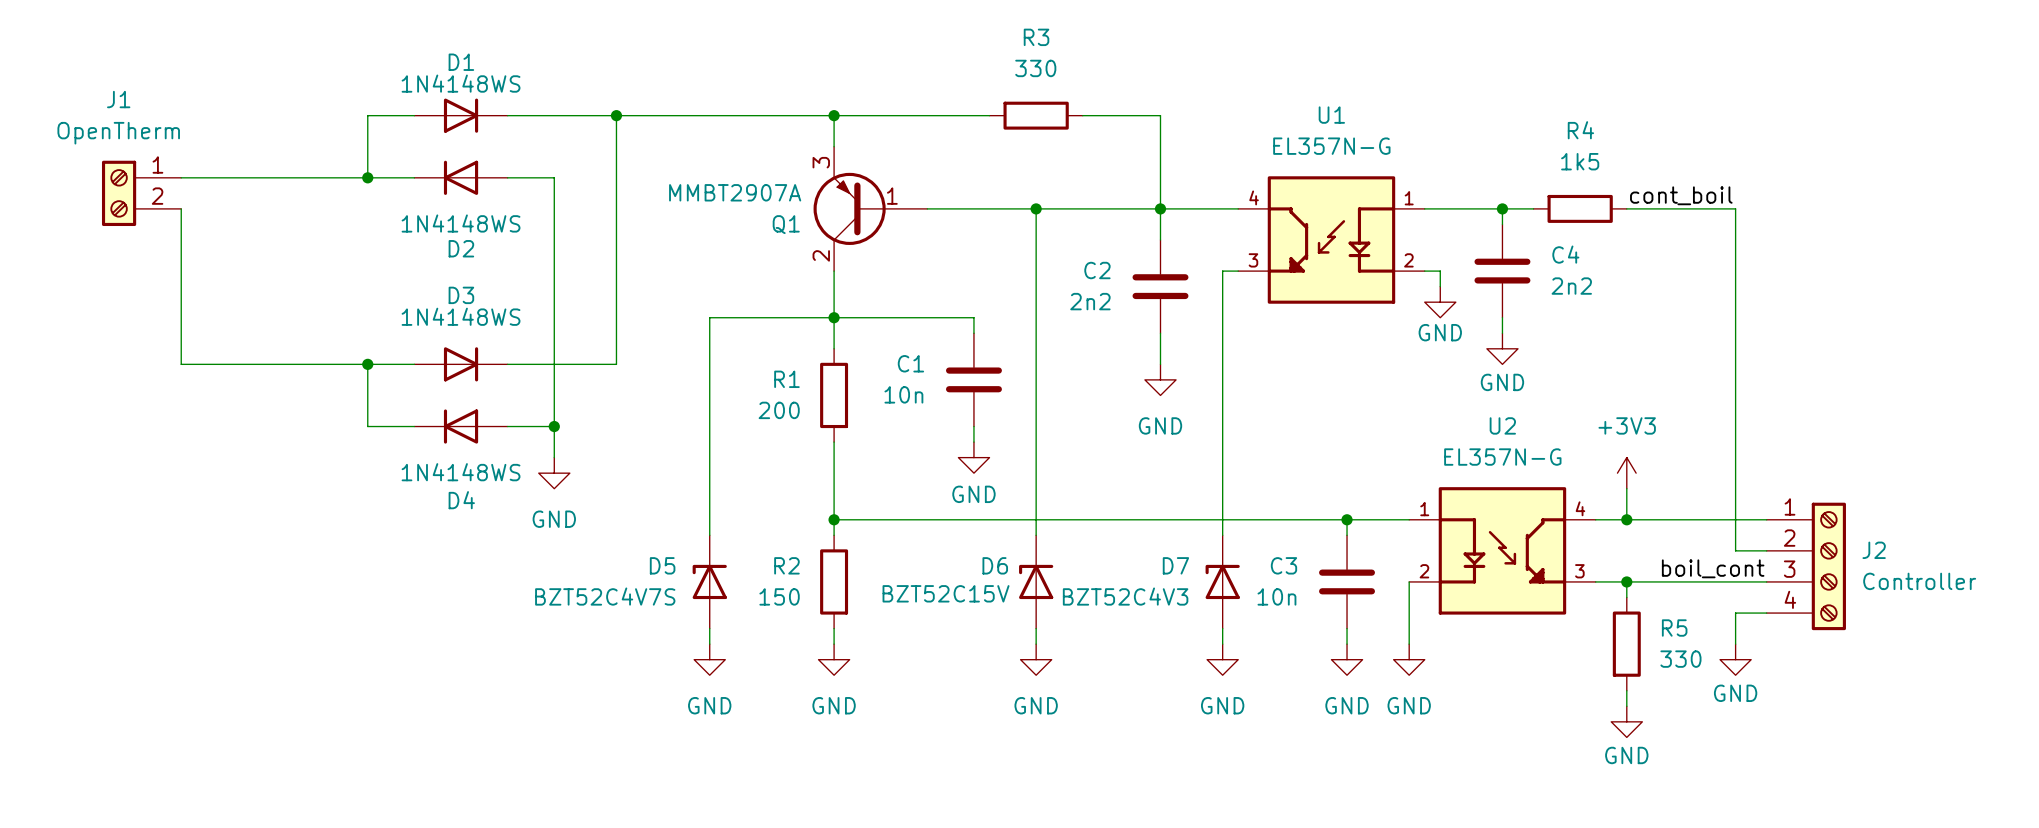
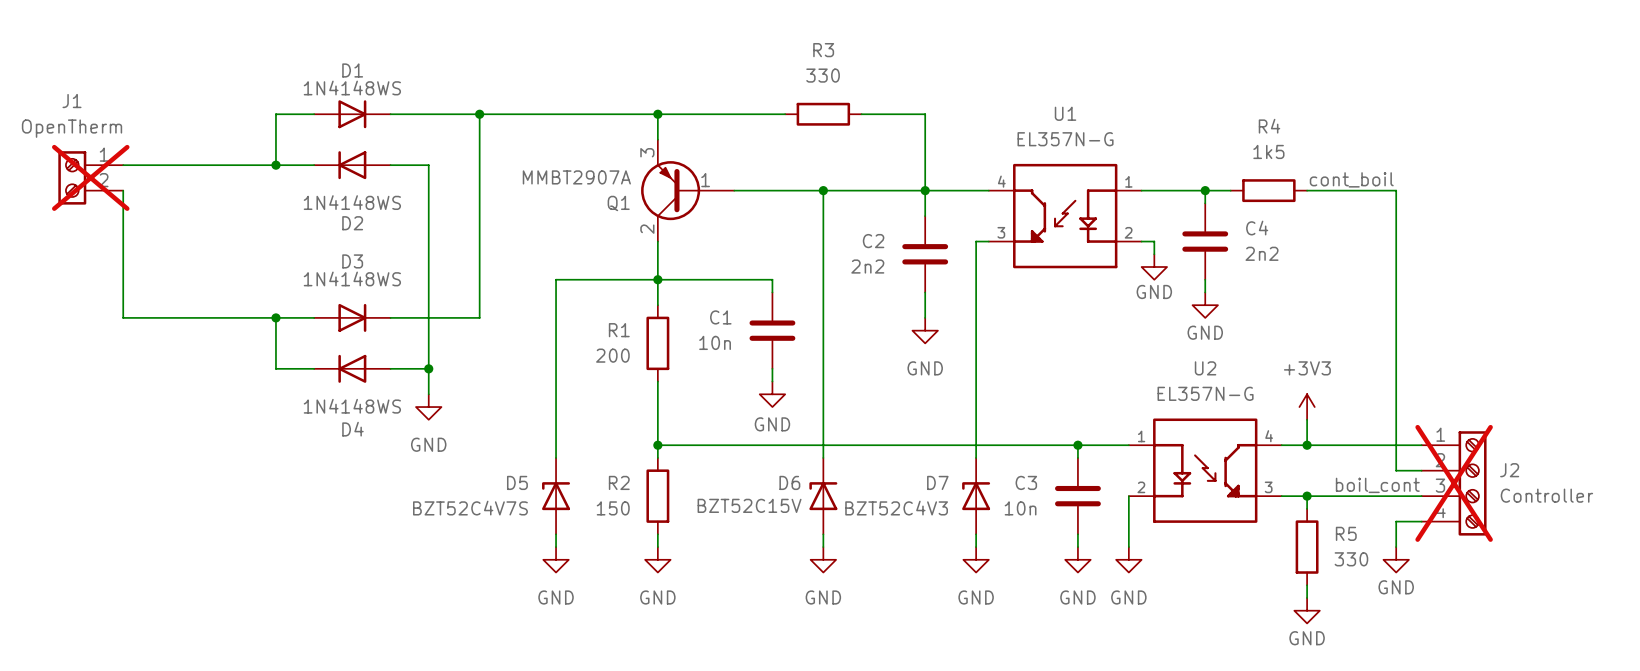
J1 do-not-place cross: none -> (90, 177)
J2 do-not-place cross: none -> (1454, 483)

